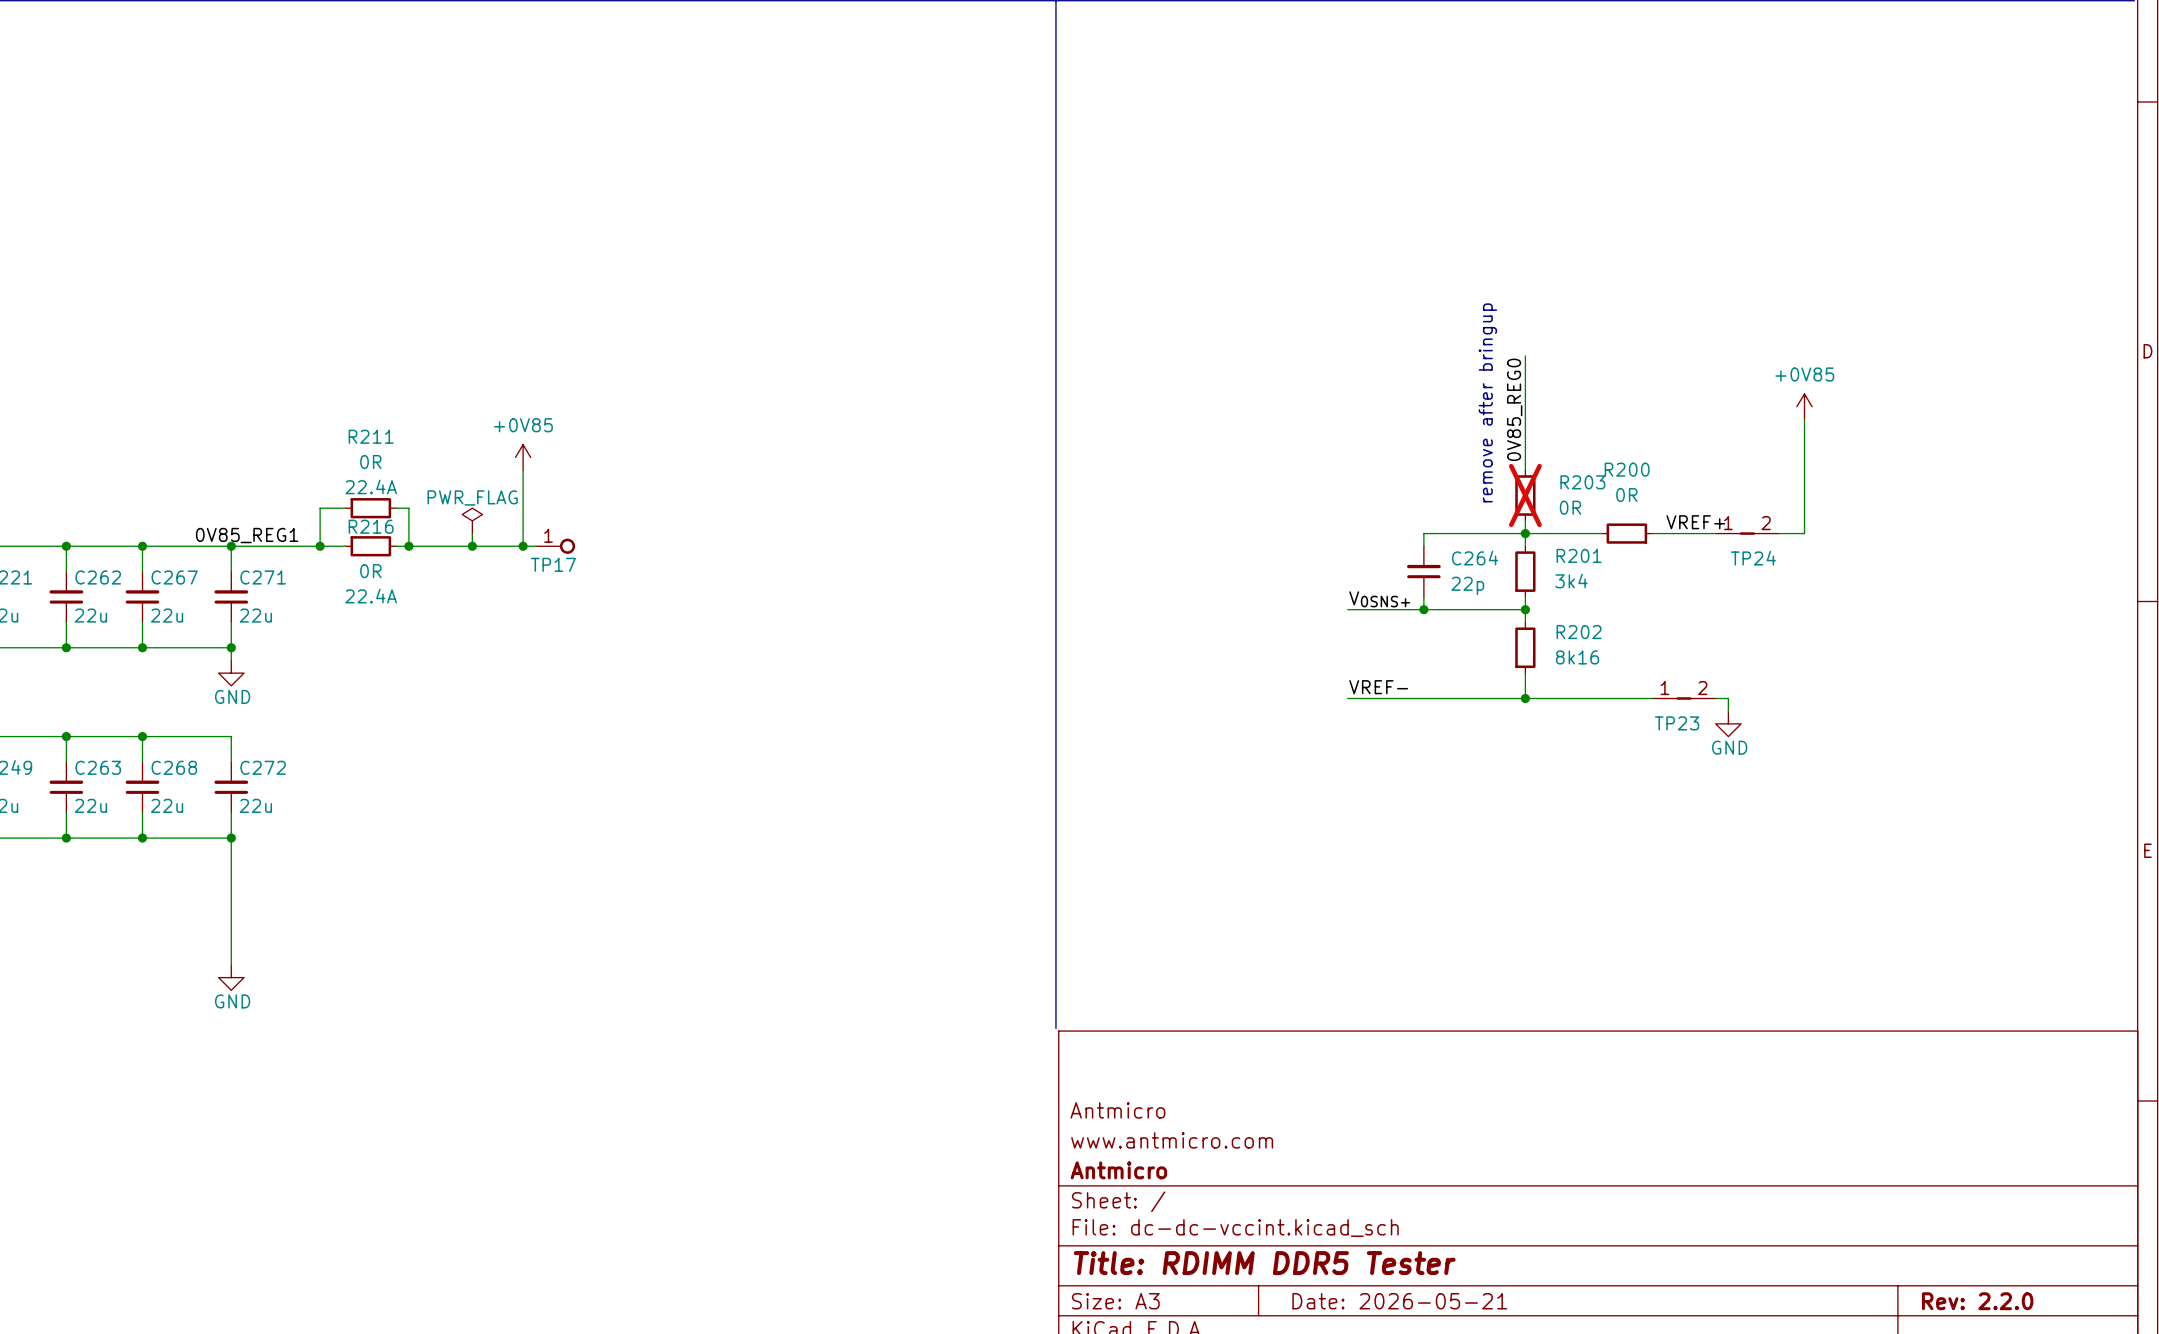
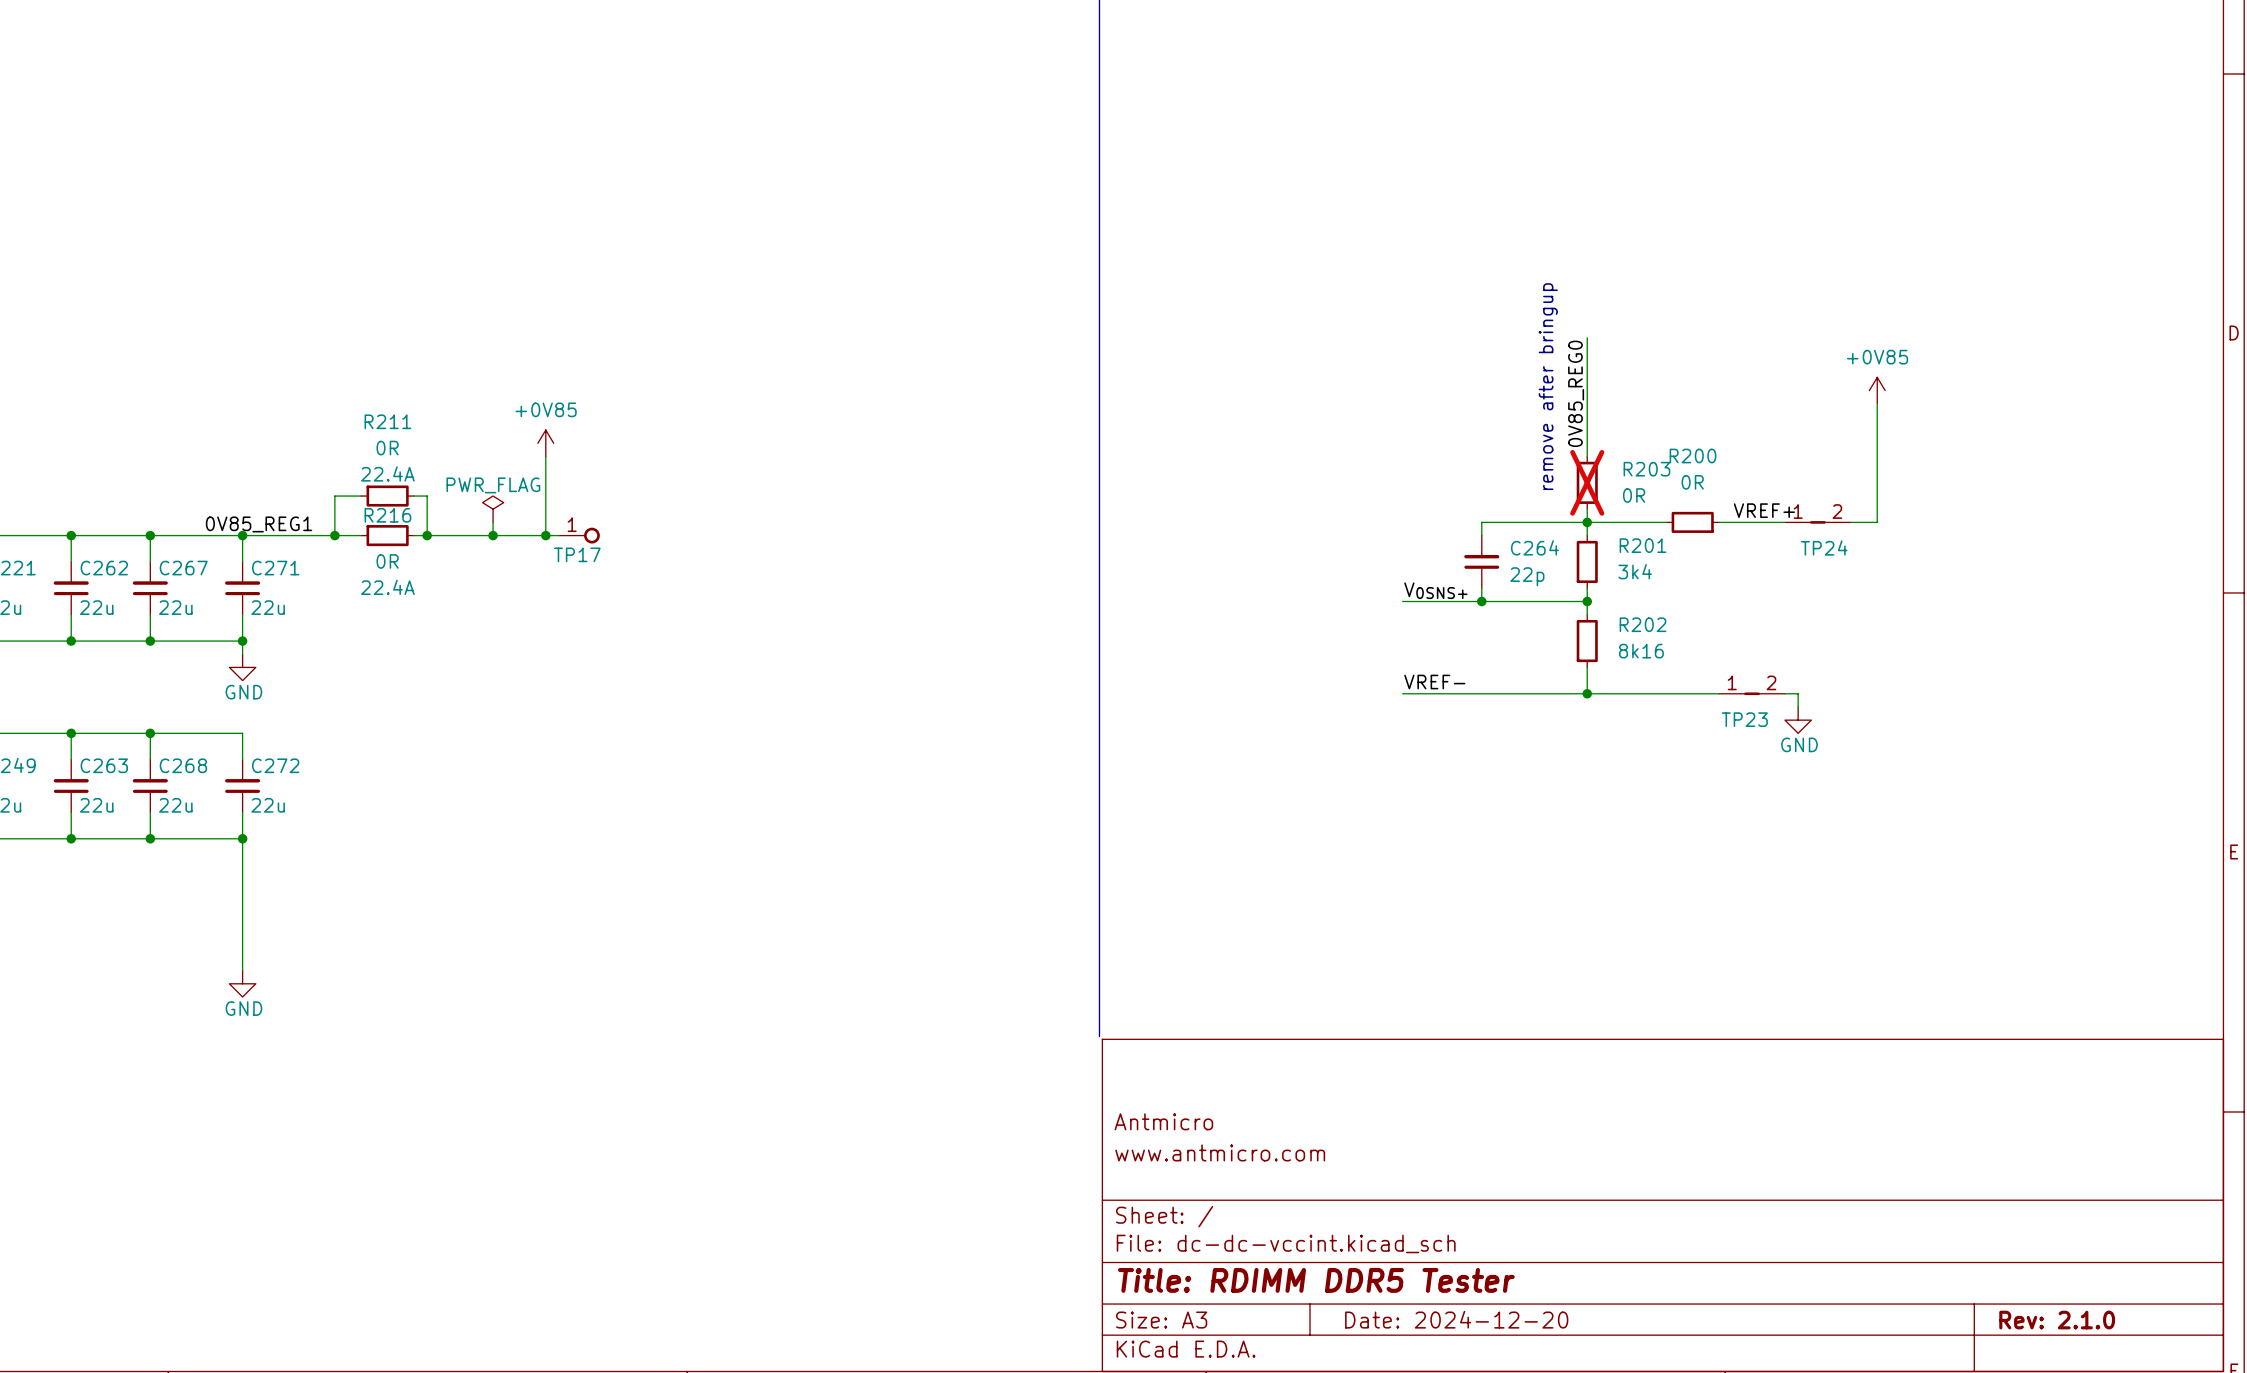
title block: Antmicro (1118, 1170) -> none
title block: Date: 2026-05-21 (1399, 1301) -> Date: 2024-12-20 (1456, 1319)
title block: Rev: 2.2.0 (1977, 1301) -> Rev: 2.1.0 (2057, 1320)

